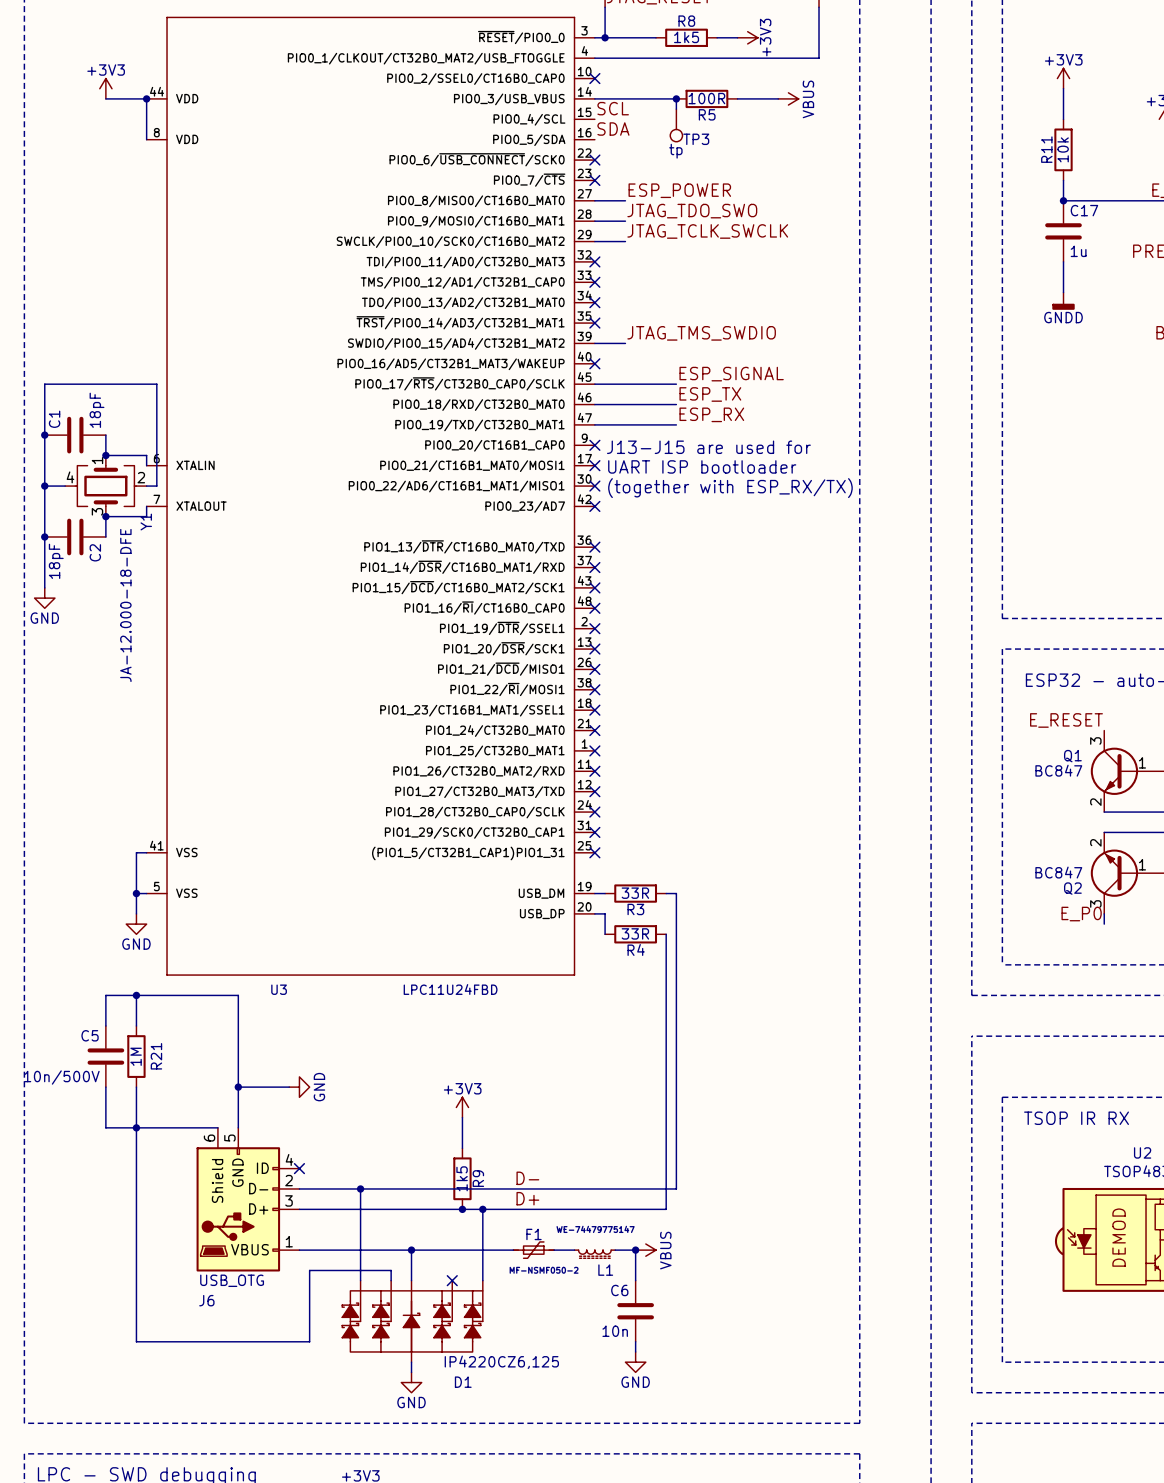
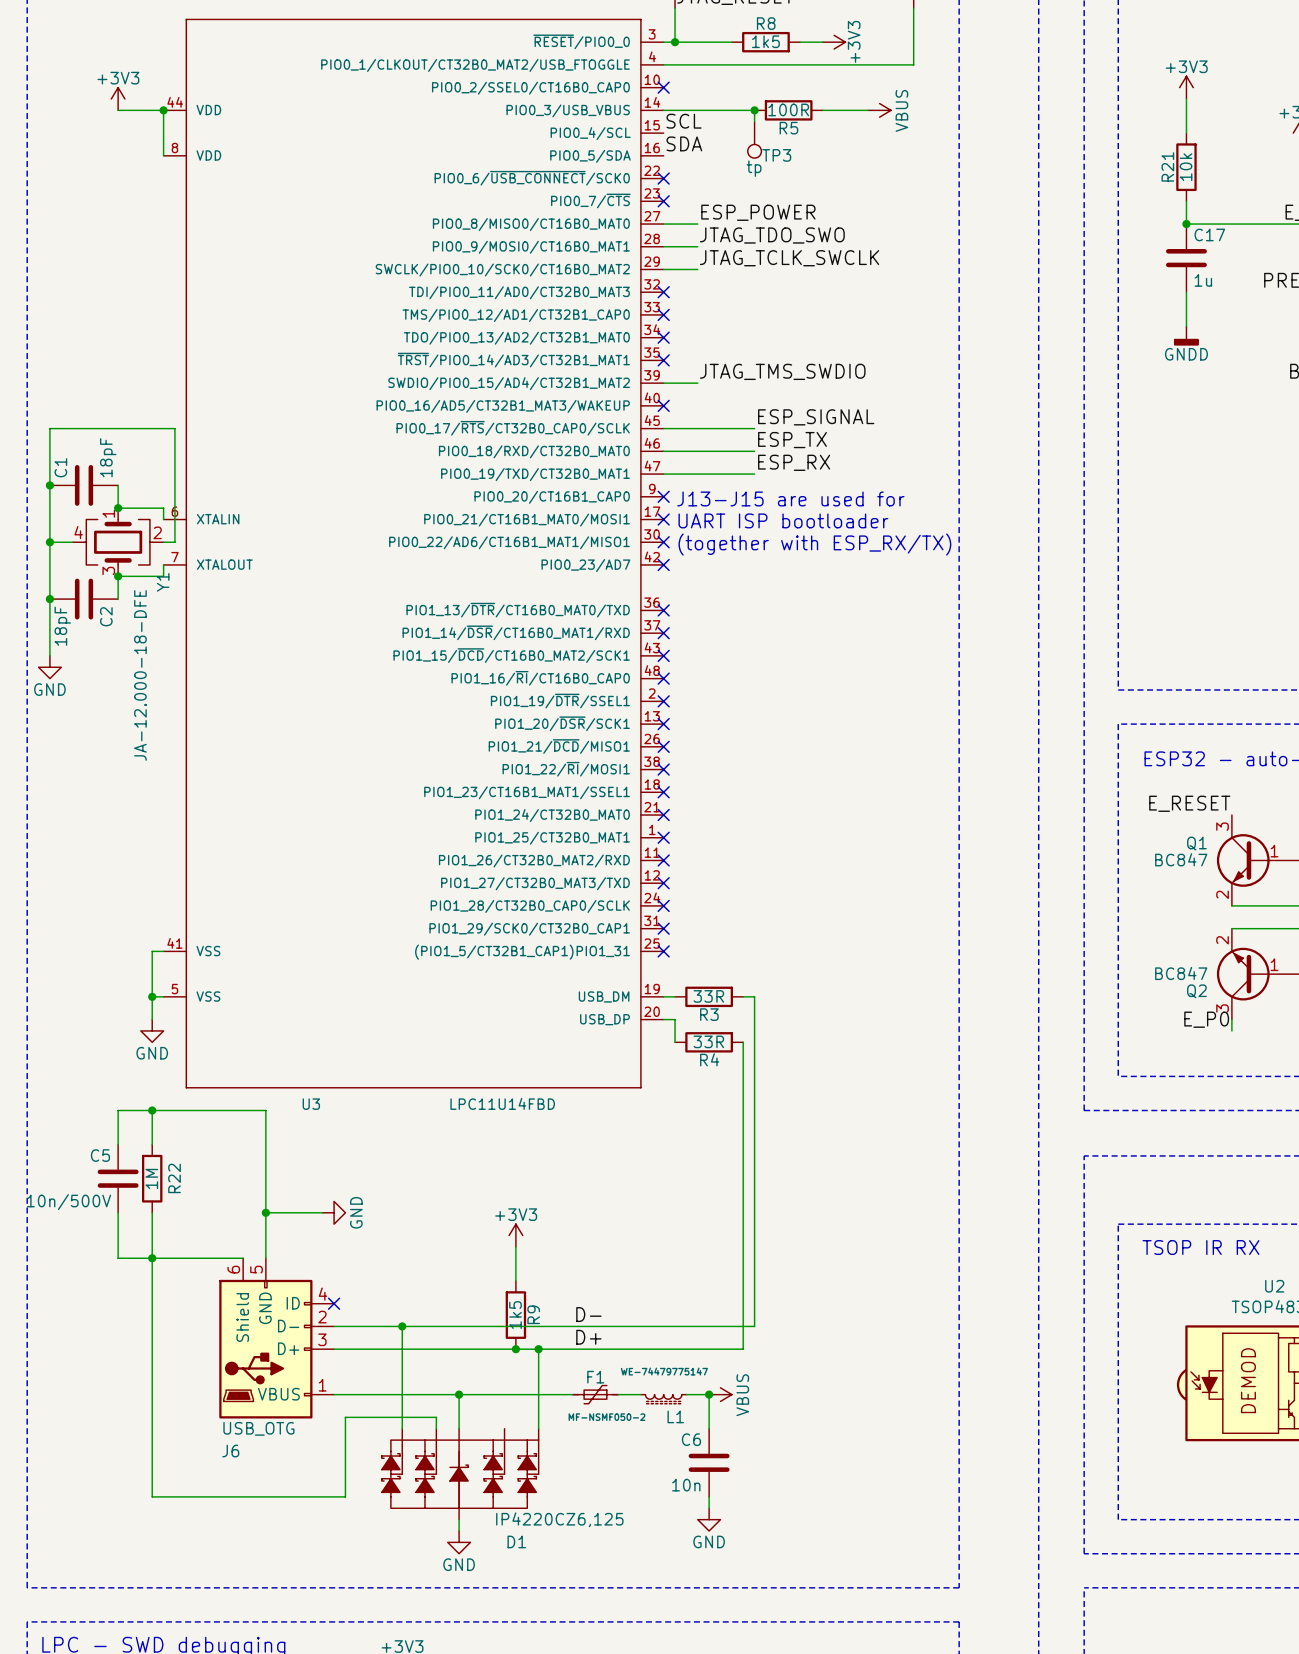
R11 name: R11 (1046, 149) -> R21 (1167, 166)
U3 value: LPC11U24FBD (450, 989) -> LPC11U14FBD (502, 1103)
R21 name: R21 (156, 1056) -> R22 (174, 1178)
no-connect mark: (452, 1280) -> none

